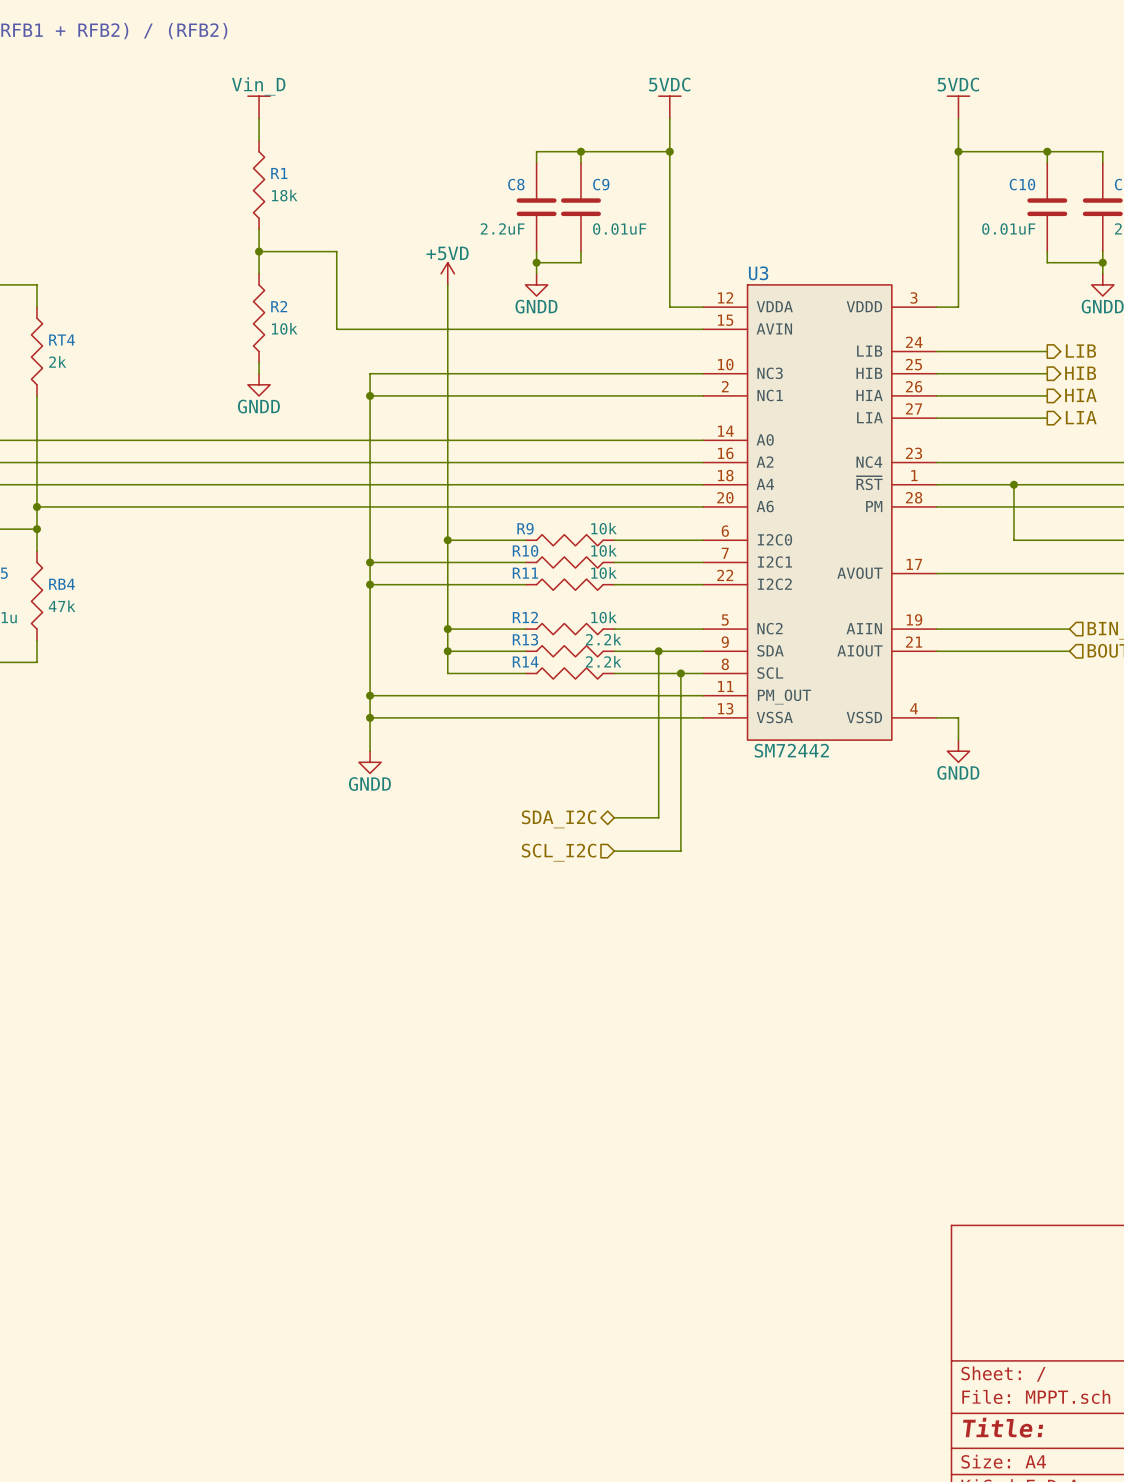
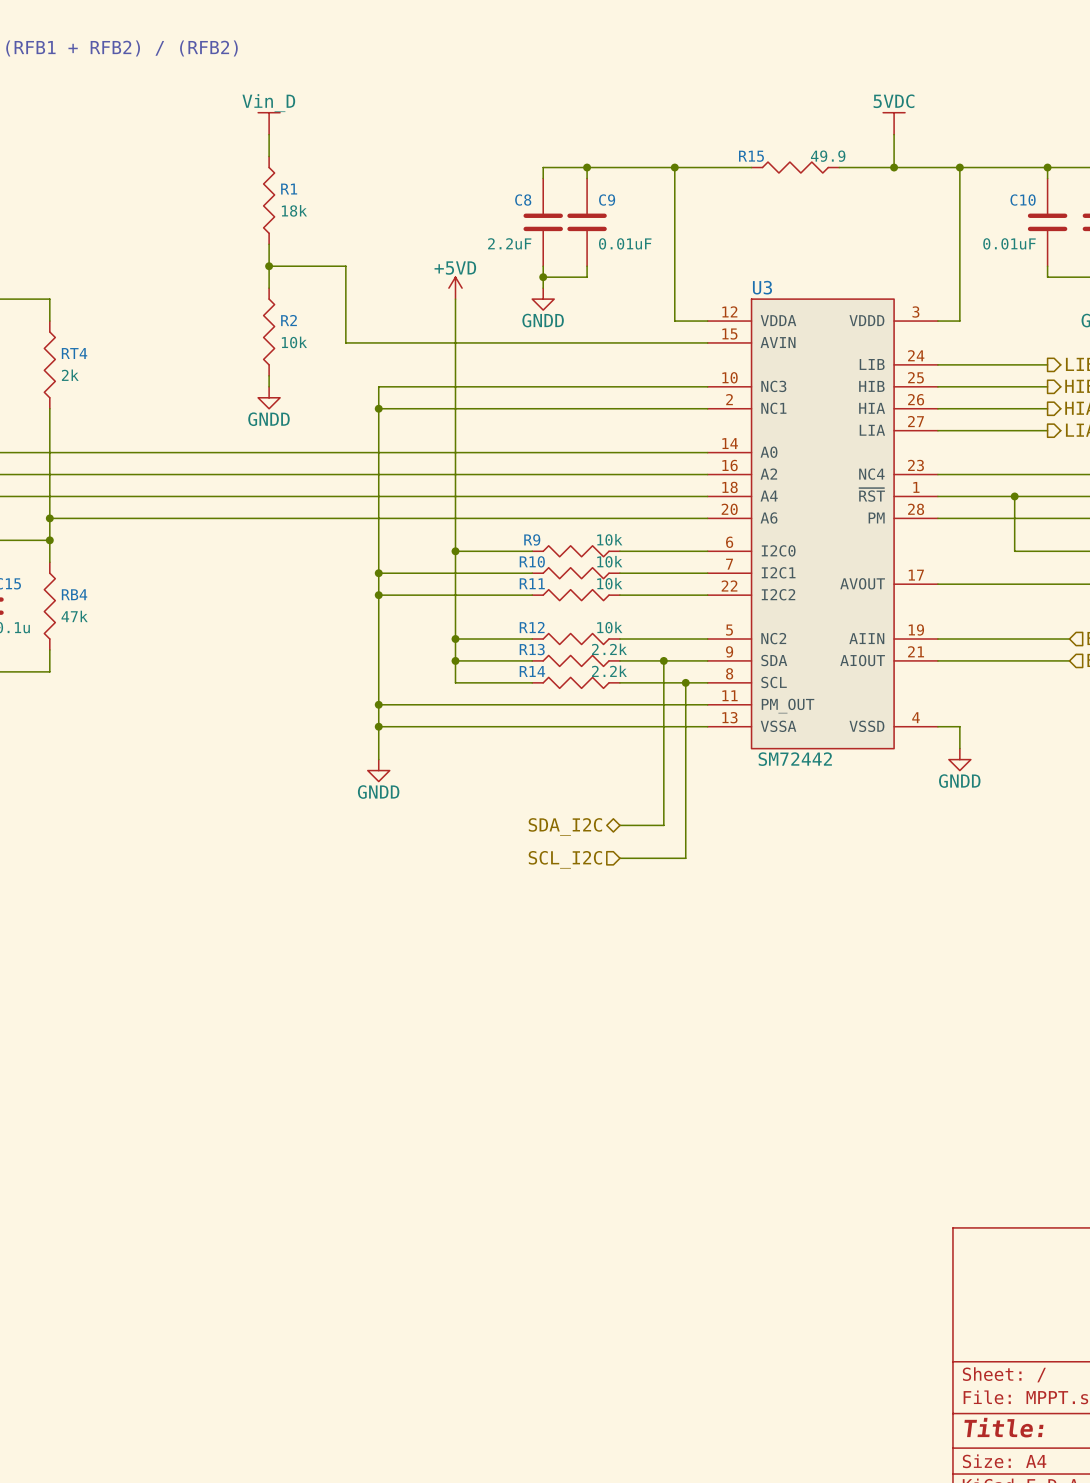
power symbol: 5VDC (669, 107) -> none
power symbol position: 5VDC (958, 107) -> 5VDC (894, 123)
wire: (669, 118) (669, 151) -> (751, 167) (674, 167)
wire: none -> (894, 134) (894, 167)
wire: (958, 118) (958, 151) -> (839, 167) (959, 167)
R15: none -> 49.9 (795, 167)
junction: none -> (894, 167)

